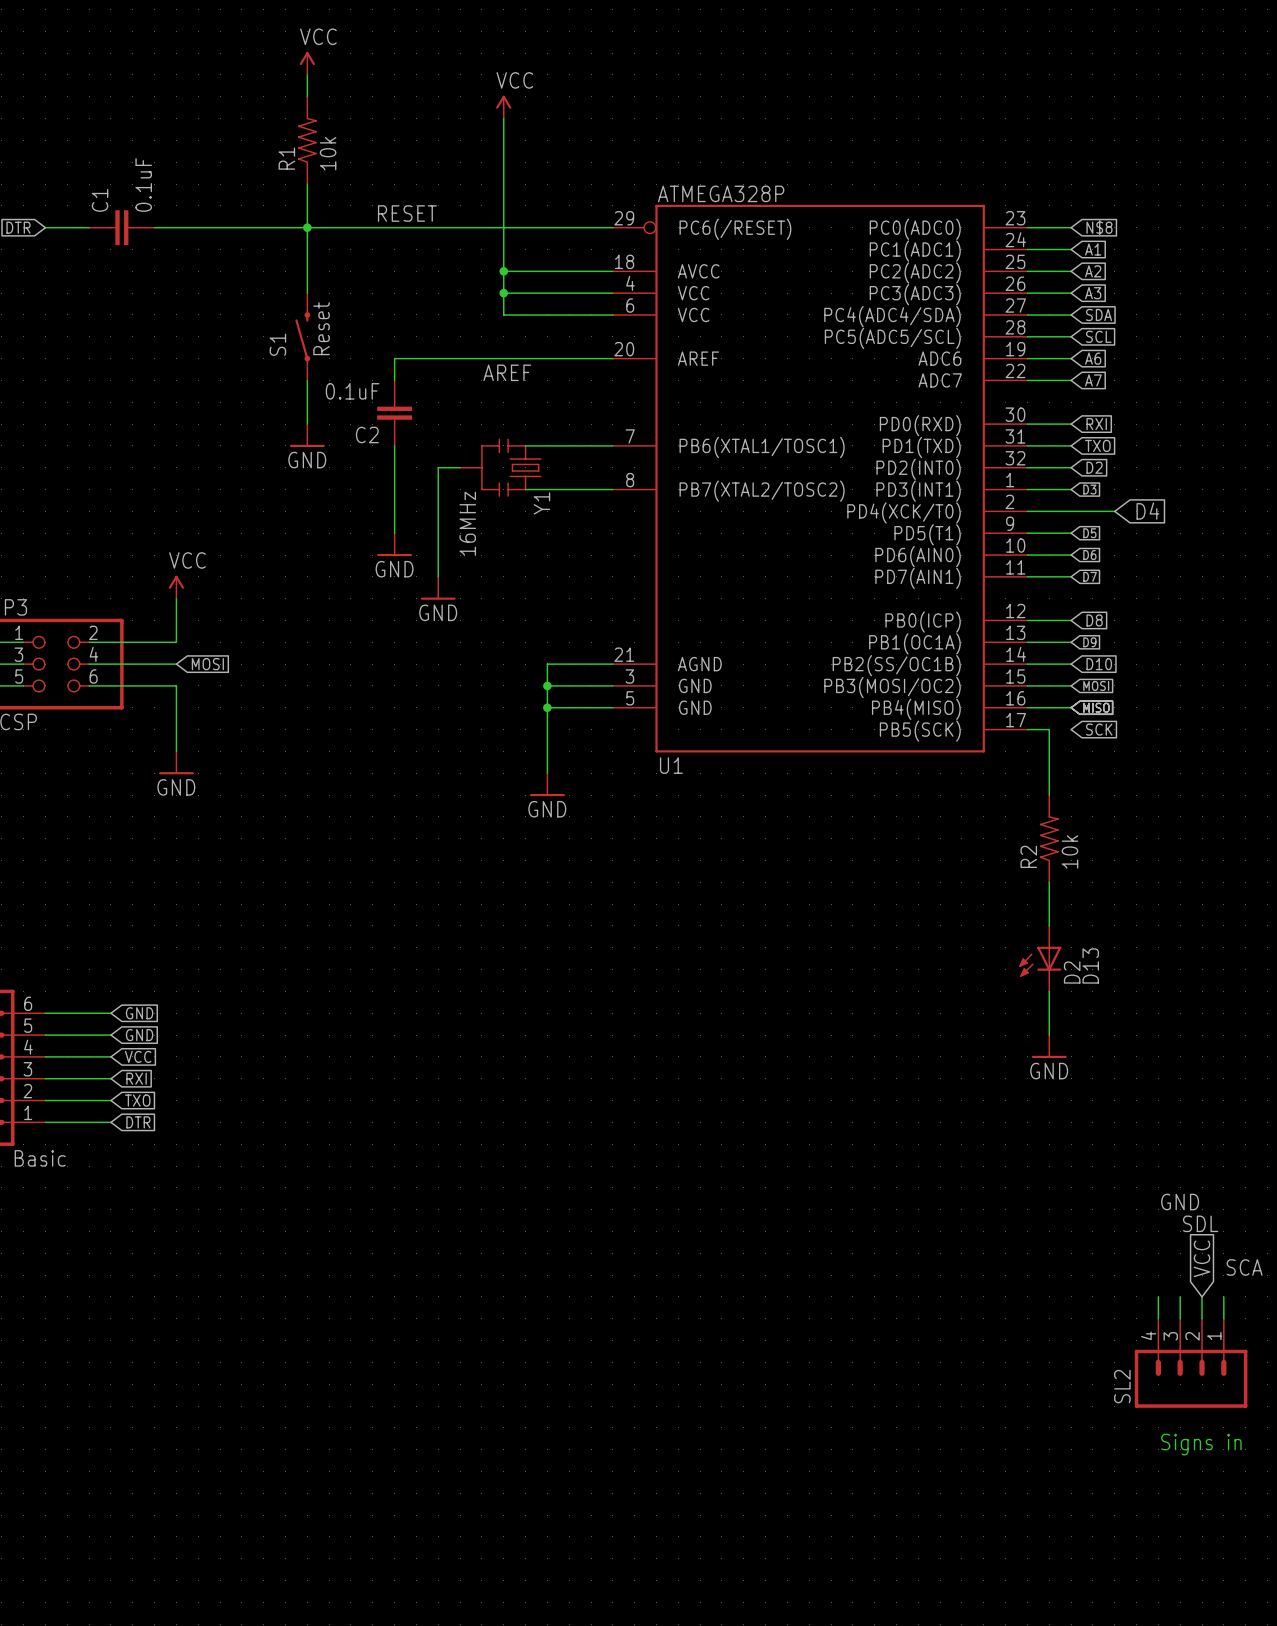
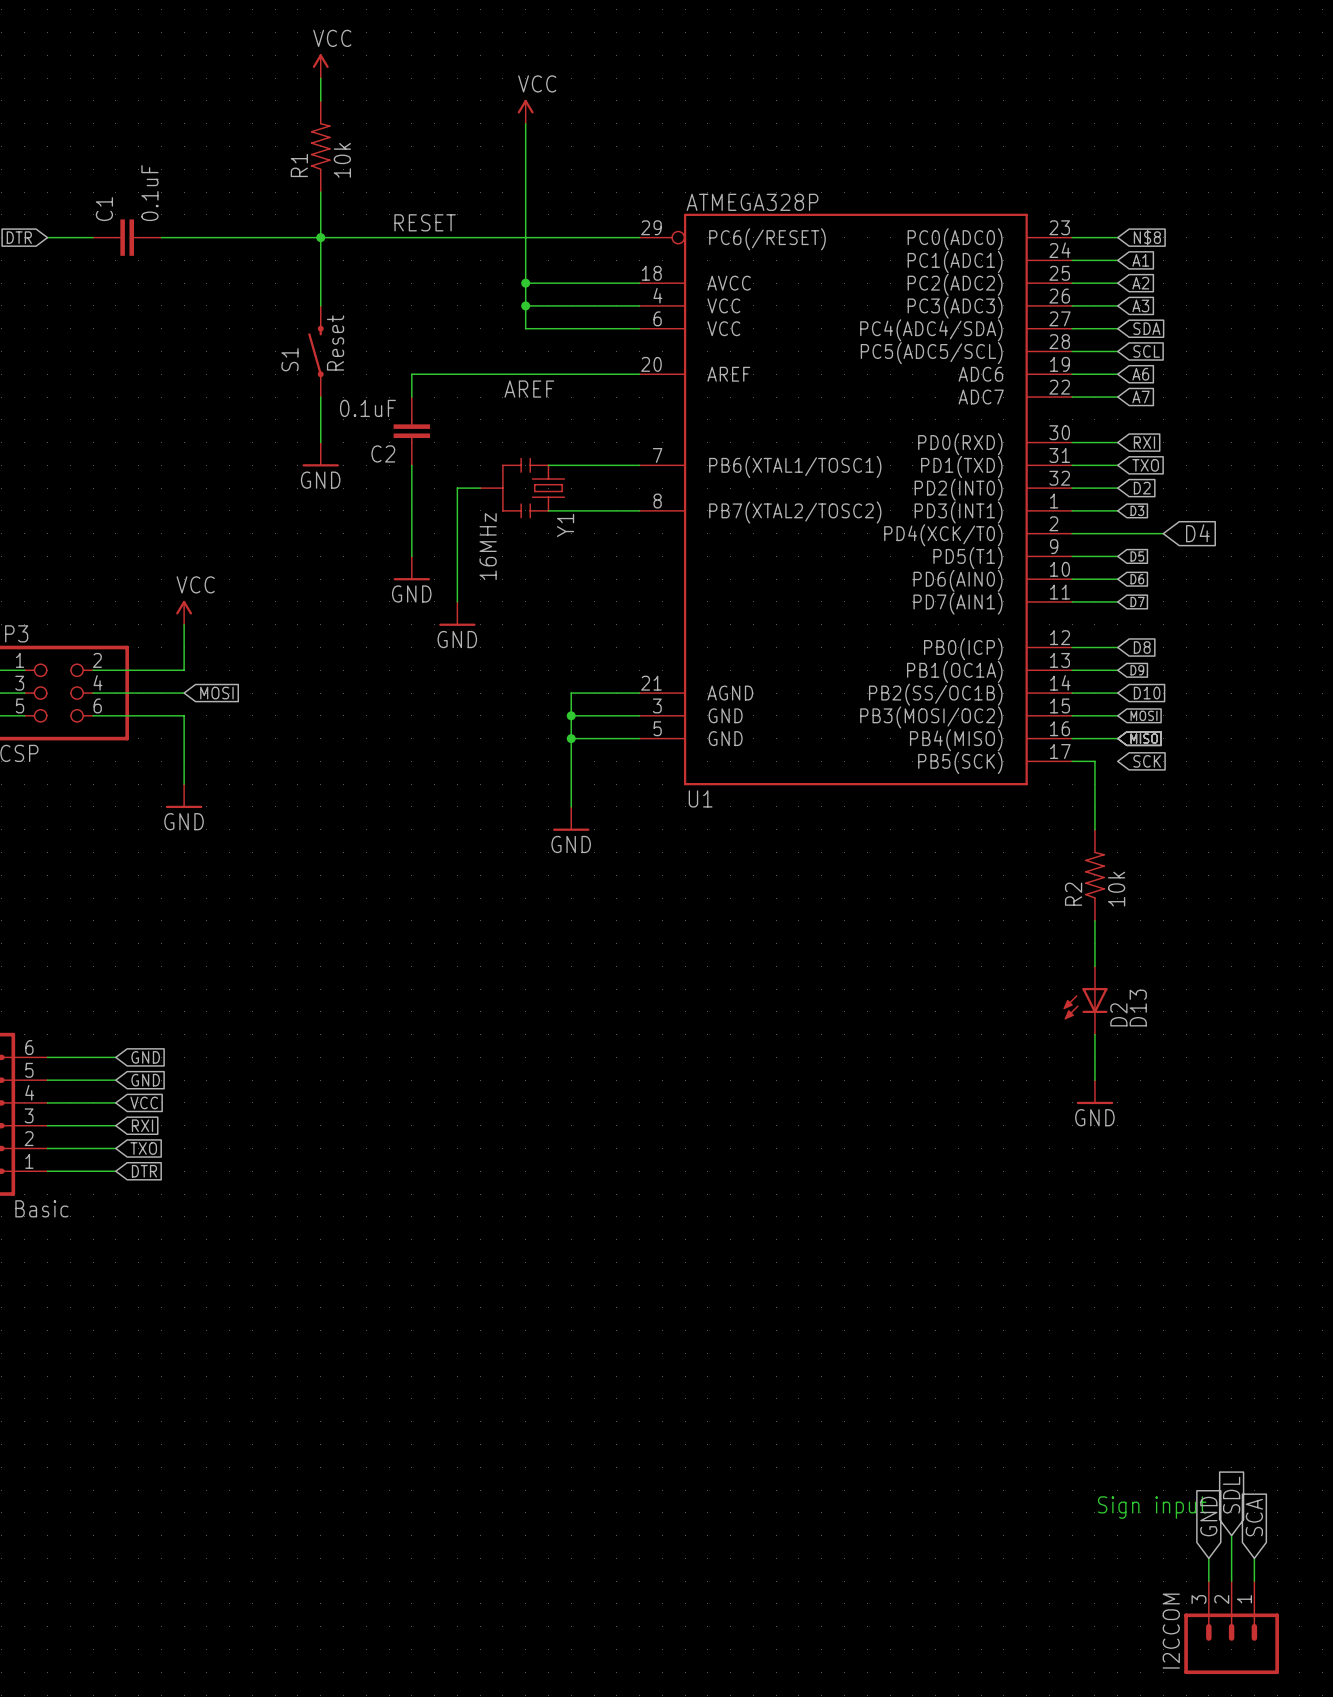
label: GND (1180, 1202) -> none
label: SDL (1200, 1223) -> none
global label: VCC (1202, 1258) -> none
label: SCA (1244, 1267) -> none
wire: (1158, 1296) (1158, 1318) -> (1208, 1558) (1208, 1581)
wire: (1180, 1296) (1180, 1318) -> none
wire: (1202, 1296) (1202, 1318) -> (1254, 1558) (1254, 1581)
wire: (1223, 1296) (1223, 1318) -> none
SL2: (1191, 1363) -> none
global label: none -> SDL (1231, 1495)
text: Signs in (1201, 1444) -> Sign input (1152, 1507)
global label: none -> GND (1208, 1516)
global label: none -> SCA (1254, 1517)
wire: none -> (1231, 1535) (1231, 1581)
I2CCOM: none -> (1231, 1627)

